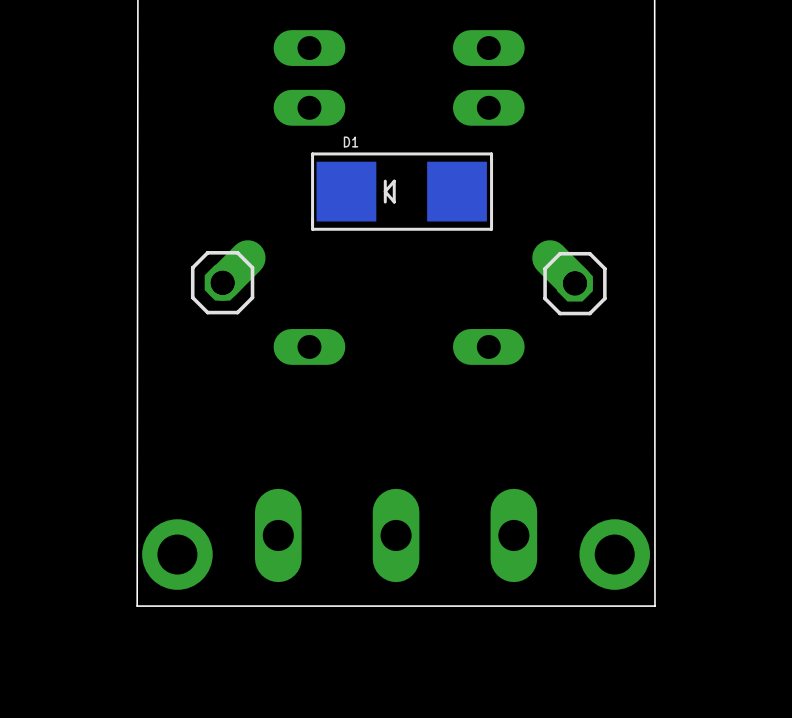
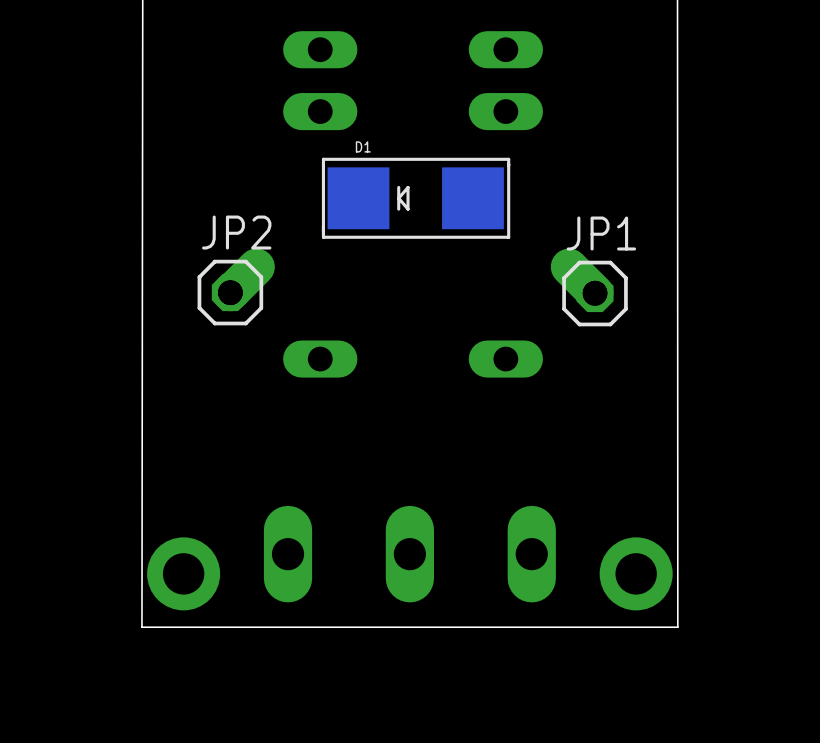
JP2 name: none -> JP2 (236, 232)
JP1 name: none -> JP1 (601, 233)

